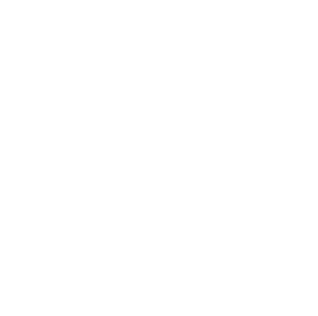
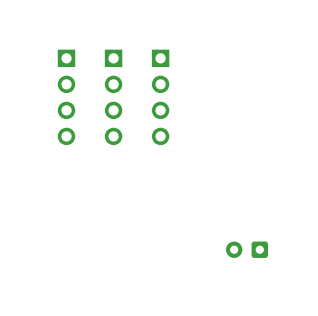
part: none -> (66, 97)
part: none -> (113, 97)
part: none -> (160, 97)
part: none -> (246, 249)

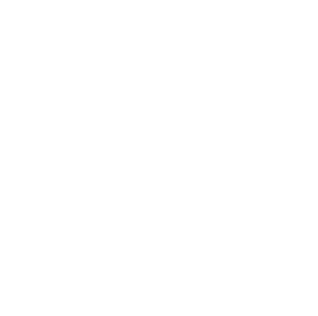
part: (66, 97) -> none
part: (113, 97) -> none
part: (160, 97) -> none
part: (246, 249) -> none

